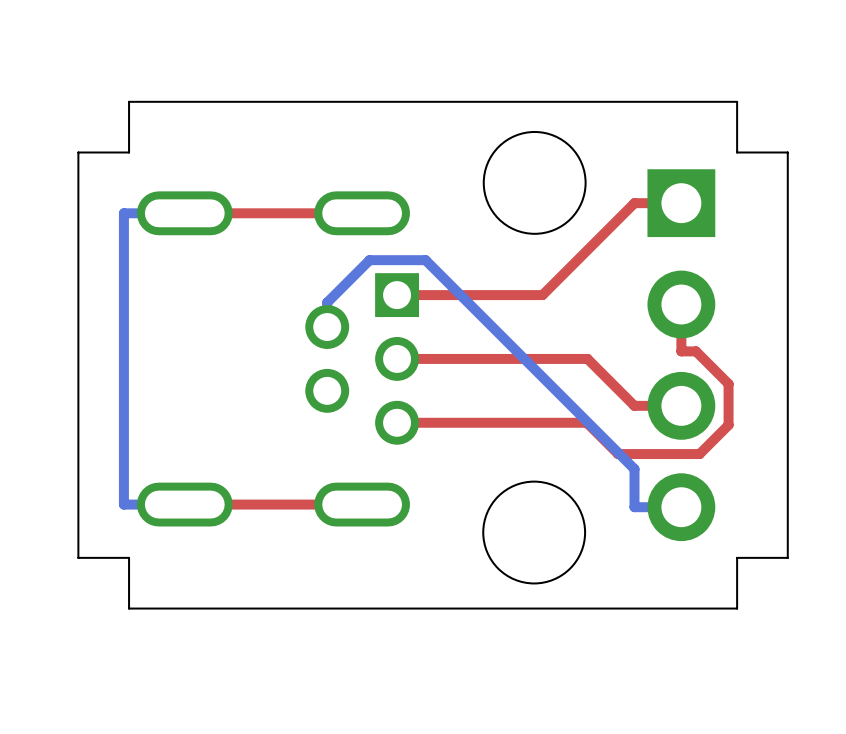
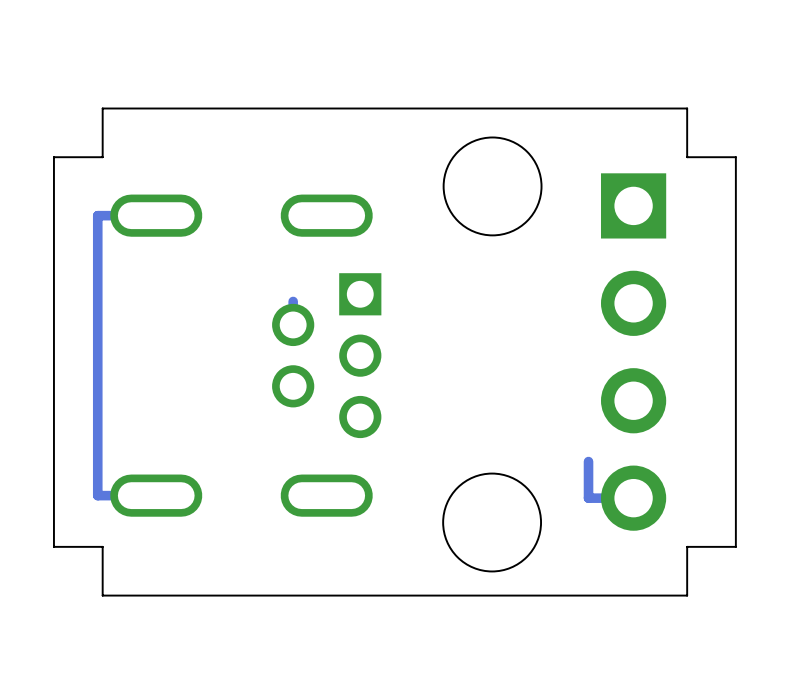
top track: (681, 203) (634, 203) (542, 295) (397, 295) -> none
top track: (362, 213) (184, 213) -> none
bottom track: (327, 302) (369, 260) (425, 260) (634, 469) -> none
top track: (681, 304) (681, 351) (696, 351) (728, 383) (728, 425) (699, 454) (618, 454) (586, 422) (397, 422) -> none
top track: (397, 358) (587, 358) (634, 405) (681, 405) -> none
top track: (362, 504) (184, 504) -> none

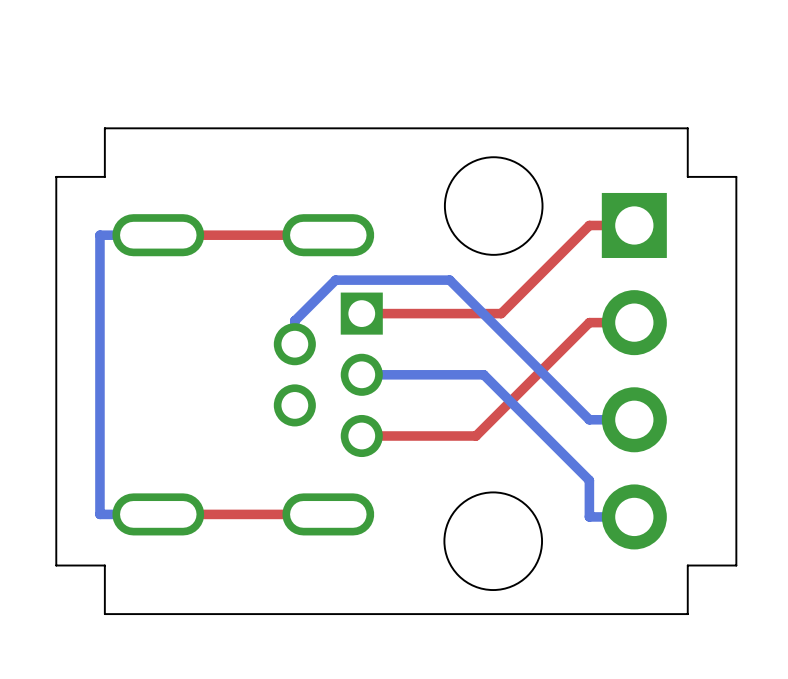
top track: none -> (634, 225) (589, 225) (501, 313) (361, 313)
top track: none -> (328, 235) (158, 235)
bottom track: none -> (294, 320) (335, 280) (449, 280) (589, 419) (634, 419)
top track: none -> (634, 322) (589, 322) (476, 436) (361, 436)
bottom track: none -> (361, 374) (483, 374) (589, 480)
top track: none -> (328, 514) (158, 514)

